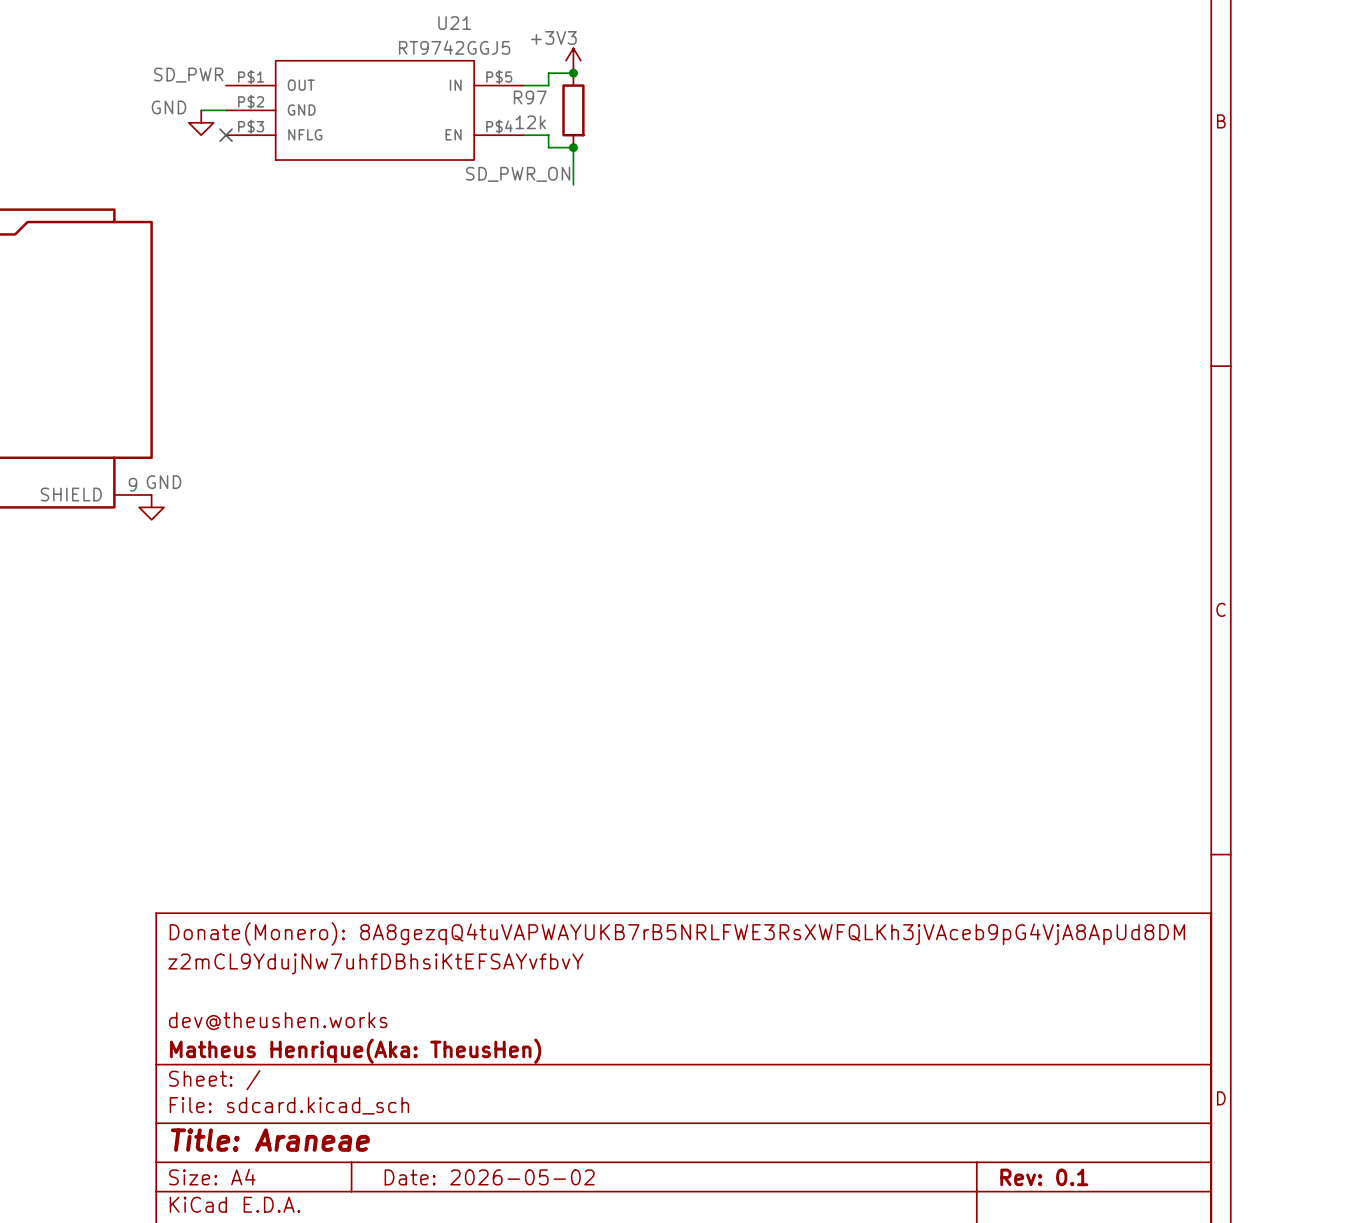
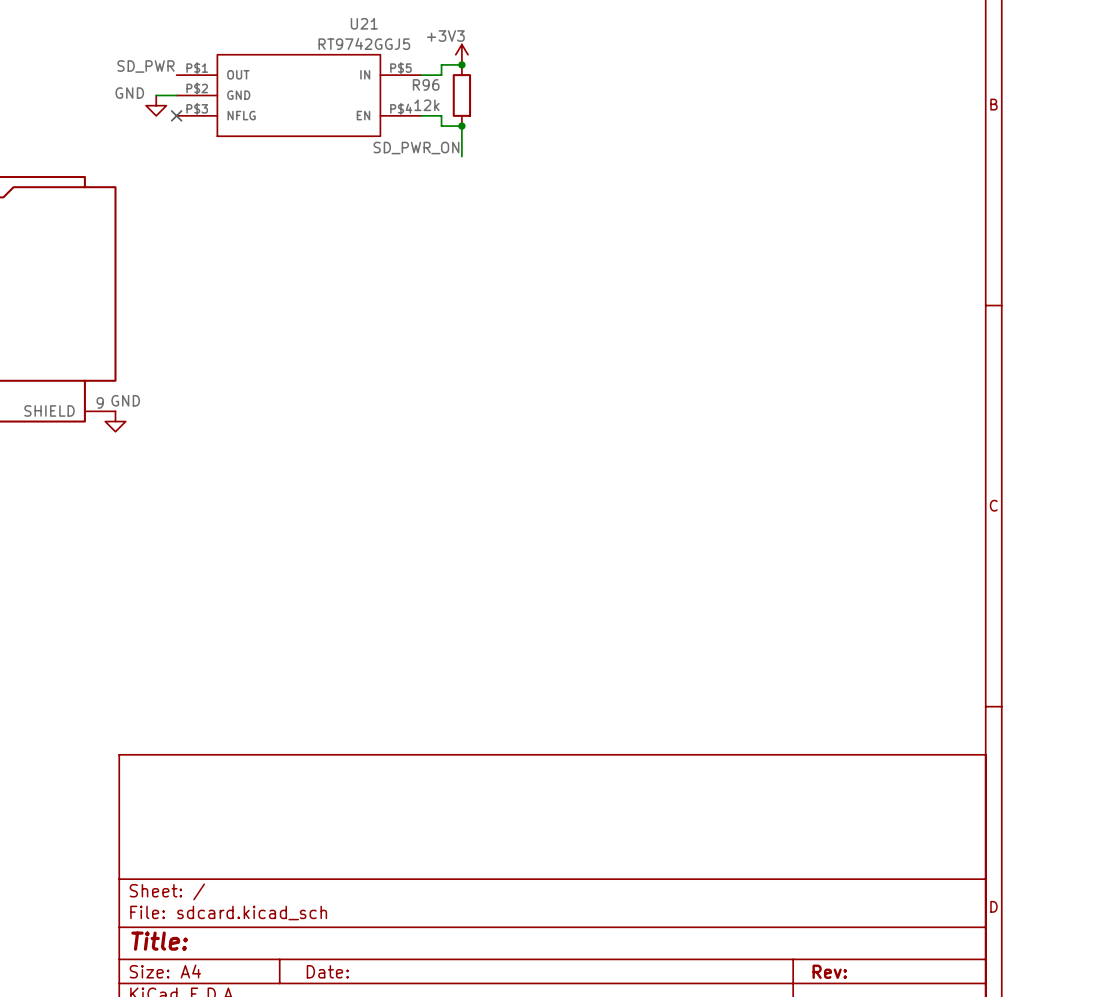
R97 name: R97 (530, 97) -> R96 (426, 84)
title block: Donate(Monero): 8A8gezqQ4tuVAPWAYUKB7rB5NRLFWE3RsXWFQLKh3jVAceb9pG4VjA8ApUd8DM (677, 933) -> none
title block: z2mCL9YdujNw7uhfDBhsiKtEFSAYvfbvY (375, 963) -> none
title block: dev@theushen.works (278, 1021) -> none
title block: Matheus Henrique(Aka: TheusHen) (355, 1051) -> none
title block: Title: Araneae (270, 1140) -> Title: (159, 941)
title block: Date: 2026-05-02 (489, 1177) -> Date: (327, 971)
title block: Rev: 0.1 (1044, 1177) -> Rev: (829, 971)

